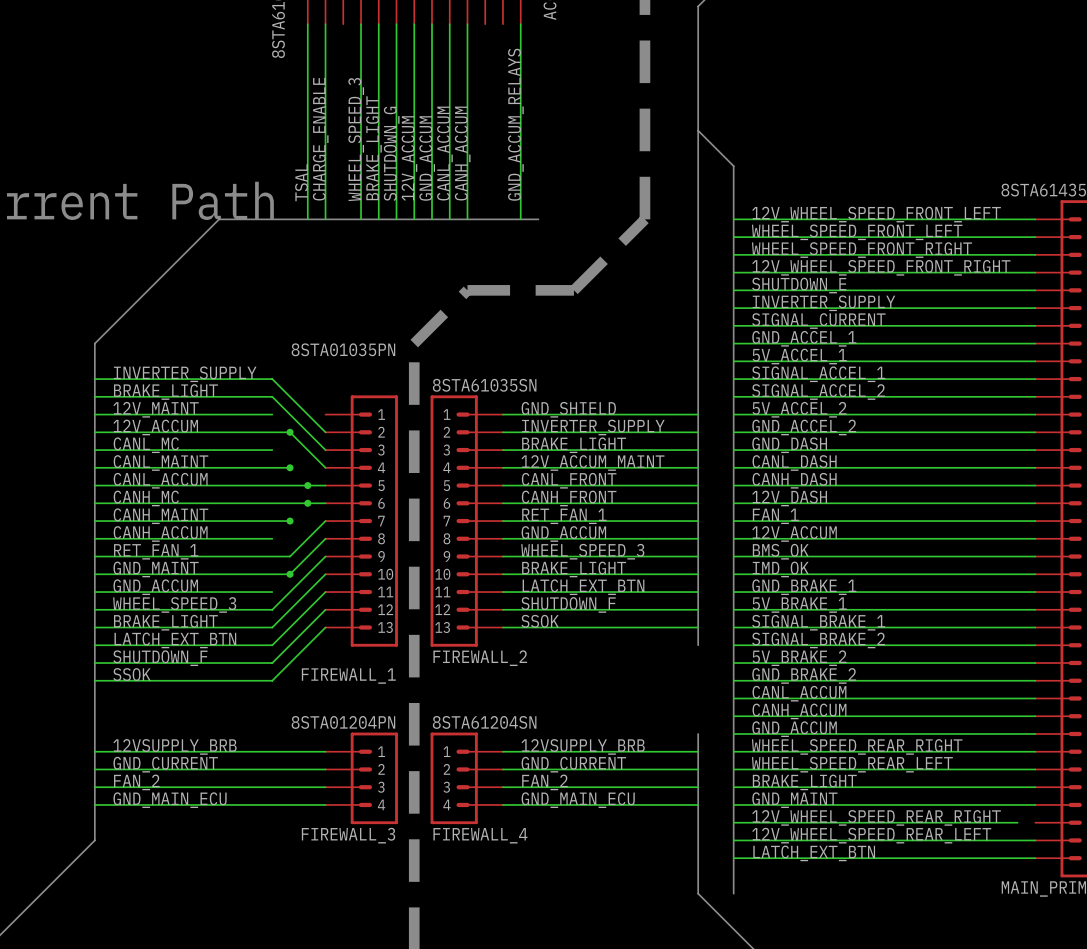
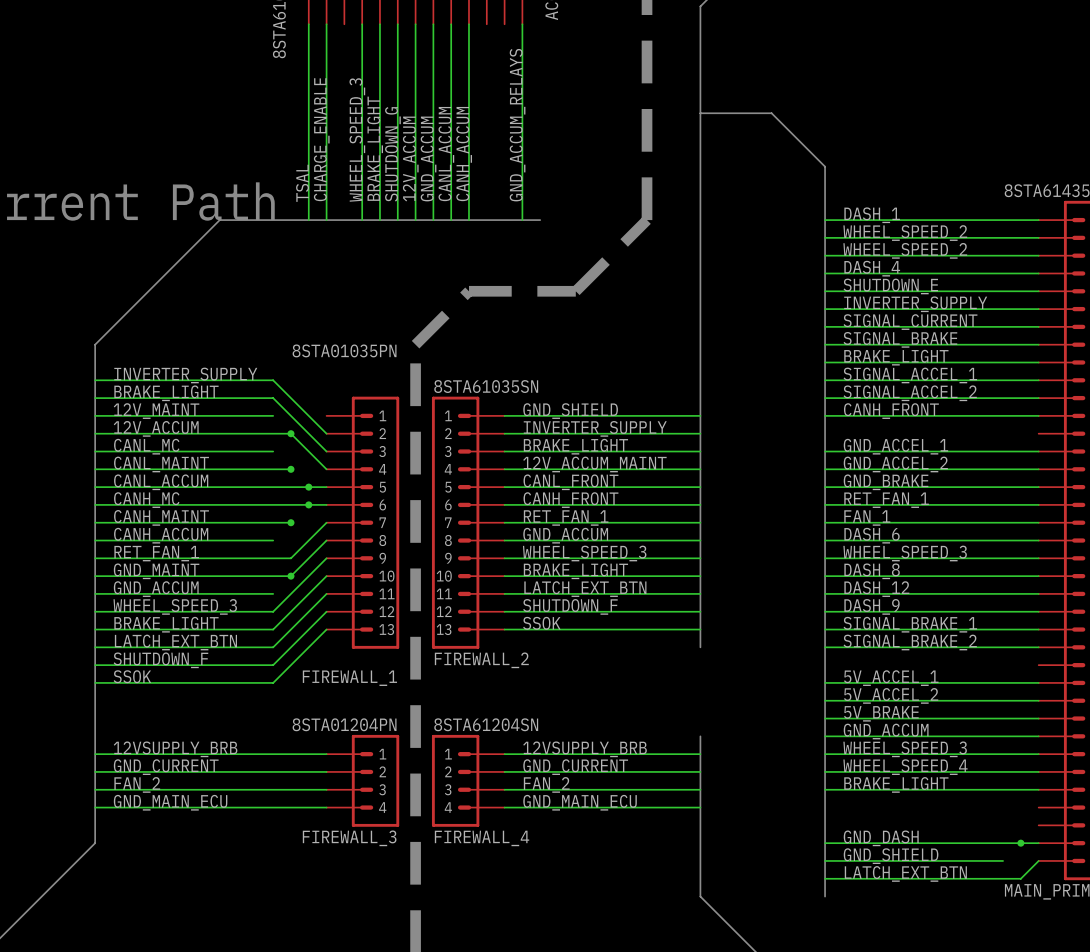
bus: none -> (700, 113) (771, 113) (825, 166) (825, 896)
bus: (698, 130) (733, 166) (733, 893) -> none
label: none -> DASH_1 (872, 215)
label: 12V_WHEEL_SPEED_FRONT_LEFT (876, 214) -> none
wire: (733, 219) (822, 219) -> none
label: WHEEL_SPEED_FRONT_LEFT (857, 232) -> none
label: none -> WHEEL_SPEED_2 (905, 233)
wire: (733, 237) (822, 237) -> none
label: WHEEL_SPEED_FRONT_RIGHT (862, 250) -> none
label: none -> WHEEL_SPEED_2 (905, 250)
wire: (733, 254) (822, 254) -> none
label: none -> DASH_4 (872, 268)
label: 12V_WHEEL_SPEED_FRONT_RIGHT (881, 267) -> none
wire: (733, 272) (822, 272) -> none
label position: SHUTDOWN_E (799, 285) -> SHUTDOWN_E (890, 286)
wire: (733, 290) (822, 290) -> none
label position: INVERTER_SUPPLY (824, 303) -> INVERTER_SUPPLY (915, 304)
wire: (733, 308) (822, 308) -> none
label position: SIGNAL_CURRENT (818, 321) -> SIGNAL_CURRENT (910, 322)
wire: (733, 325) (822, 325) -> none
label position: GND_ACCEL_1 (804, 338) -> GND_ACCEL_1 (895, 446)
label: none -> SIGNAL_BRAKE (900, 339)
wire: (733, 343) (822, 343) -> none
label: 5V_ACCEL_1 (799, 356) -> none
label: none -> BRAKE_LIGHT (896, 357)
wire: (733, 361) (822, 361) -> none
label position: SIGNAL_ACCEL_1 (818, 374) -> SIGNAL_ACCEL_1 (910, 375)
wire: (733, 379) (822, 379) -> none
label position: SIGNAL_ACCEL_2 (818, 392) -> SIGNAL_ACCEL_2 (910, 393)
wire: (733, 396) (822, 396) -> none
label: 5V_ACCEL_2 (799, 409) -> none
label: none -> CANH_FRONT (891, 411)
wire: (733, 414) (822, 414) -> none
label position: GND_ACCEL_2 (804, 427) -> GND_ACCEL_2 (895, 464)
wire: (733, 432) (1035, 432) -> none
label: GND_DASH (789, 445) -> none
wire: (733, 450) (822, 450) -> none
label: CANL_DASH (794, 462) -> none
wire: (733, 467) (822, 467) -> none
label: CANH_DASH (794, 480) -> none
label: none -> GND_BRAKE (886, 482)
wire: (733, 485) (822, 485) -> none
label: 12V_DASH (789, 498) -> none
label: none -> RET_FAN_1 (886, 500)
wire: (733, 503) (822, 503) -> none
label position: FAN_1 (775, 516) -> FAN_1 (867, 518)
wire: (733, 521) (822, 521) -> none
label: 12V_ACCUM (794, 533) -> none
label: none -> DASH_6 (872, 535)
wire: (733, 538) (822, 538) -> none
label: BMS_OK (780, 551) -> none
label: none -> WHEEL_SPEED_3 (905, 553)
wire: (733, 556) (822, 556) -> none
label: IMD_OK (780, 569) -> none
label: none -> DASH_8 (872, 571)
wire: (733, 574) (822, 574) -> none
label: GND_BRAKE_1 (804, 587) -> none
label: none -> DASH_12 (876, 589)
wire: (733, 592) (822, 592) -> none
label: none -> DASH_9 (872, 606)
label: 5V_BRAKE_1 (799, 605) -> none
wire: (733, 609) (822, 609) -> none
label position: SIGNAL_BRAKE_1 (818, 622) -> SIGNAL_BRAKE_1 (910, 624)
wire: (733, 627) (822, 627) -> none
label position: SIGNAL_BRAKE_2 (818, 640) -> SIGNAL_BRAKE_2 (910, 642)
wire: (733, 645) (822, 645) -> none
label: 5V_BRAKE_2 (799, 658) -> none
wire: (733, 663) (1035, 663) -> none
label: GND_BRAKE_2 (804, 675) -> none
label: none -> 5V_ACCEL_1 (891, 678)
wire: (733, 680) (822, 680) -> none
label: CANL_ACCUM (799, 693) -> none
label: none -> 5V_ACCEL_2 (891, 695)
wire: (733, 698) (822, 698) -> none
label: CANH_ACCUM (799, 711) -> none
label: none -> 5V_BRAKE (881, 713)
wire: (733, 716) (822, 716) -> none
label position: GND_ACCUM (794, 729) -> GND_ACCUM (886, 731)
wire: (733, 733) (822, 733) -> none
label: WHEEL_SPEED_REAR_RIGHT (857, 746) -> none
label: none -> WHEEL_SPEED_3 (905, 749)
wire: (733, 751) (822, 751) -> none
label: WHEEL_SPEED_REAR_LEFT (852, 764) -> none
label: none -> WHEEL_SPEED_4 (905, 767)
wire: (733, 769) (822, 769) -> none
label position: BRAKE_LIGHT (804, 782) -> BRAKE_LIGHT (896, 784)
wire: (733, 787) (822, 787) -> none
label: GND_MAINT (794, 800) -> none
wire: (733, 804) (1035, 804) -> none
label: 12V_WHEEL_SPEED_REAR_RIGHT (876, 817) -> none
wire: (733, 822) (1017, 822) -> none
label: 12V_WHEEL_SPEED_REAR_LEFT (871, 835) -> none
label: none -> GND_DASH (881, 838)
wire: (733, 840) (822, 840) -> none
junction: none -> (1020, 843)
label position: LATCH_EXT_BTN (814, 853) -> LATCH_EXT_BTN (905, 873)
label: none -> GND_SHIELD (891, 856)
wire: (733, 858) (822, 858) -> none
wire: (999, 858) (1035, 858) -> (825, 878) (1020, 878) (1038, 860)

